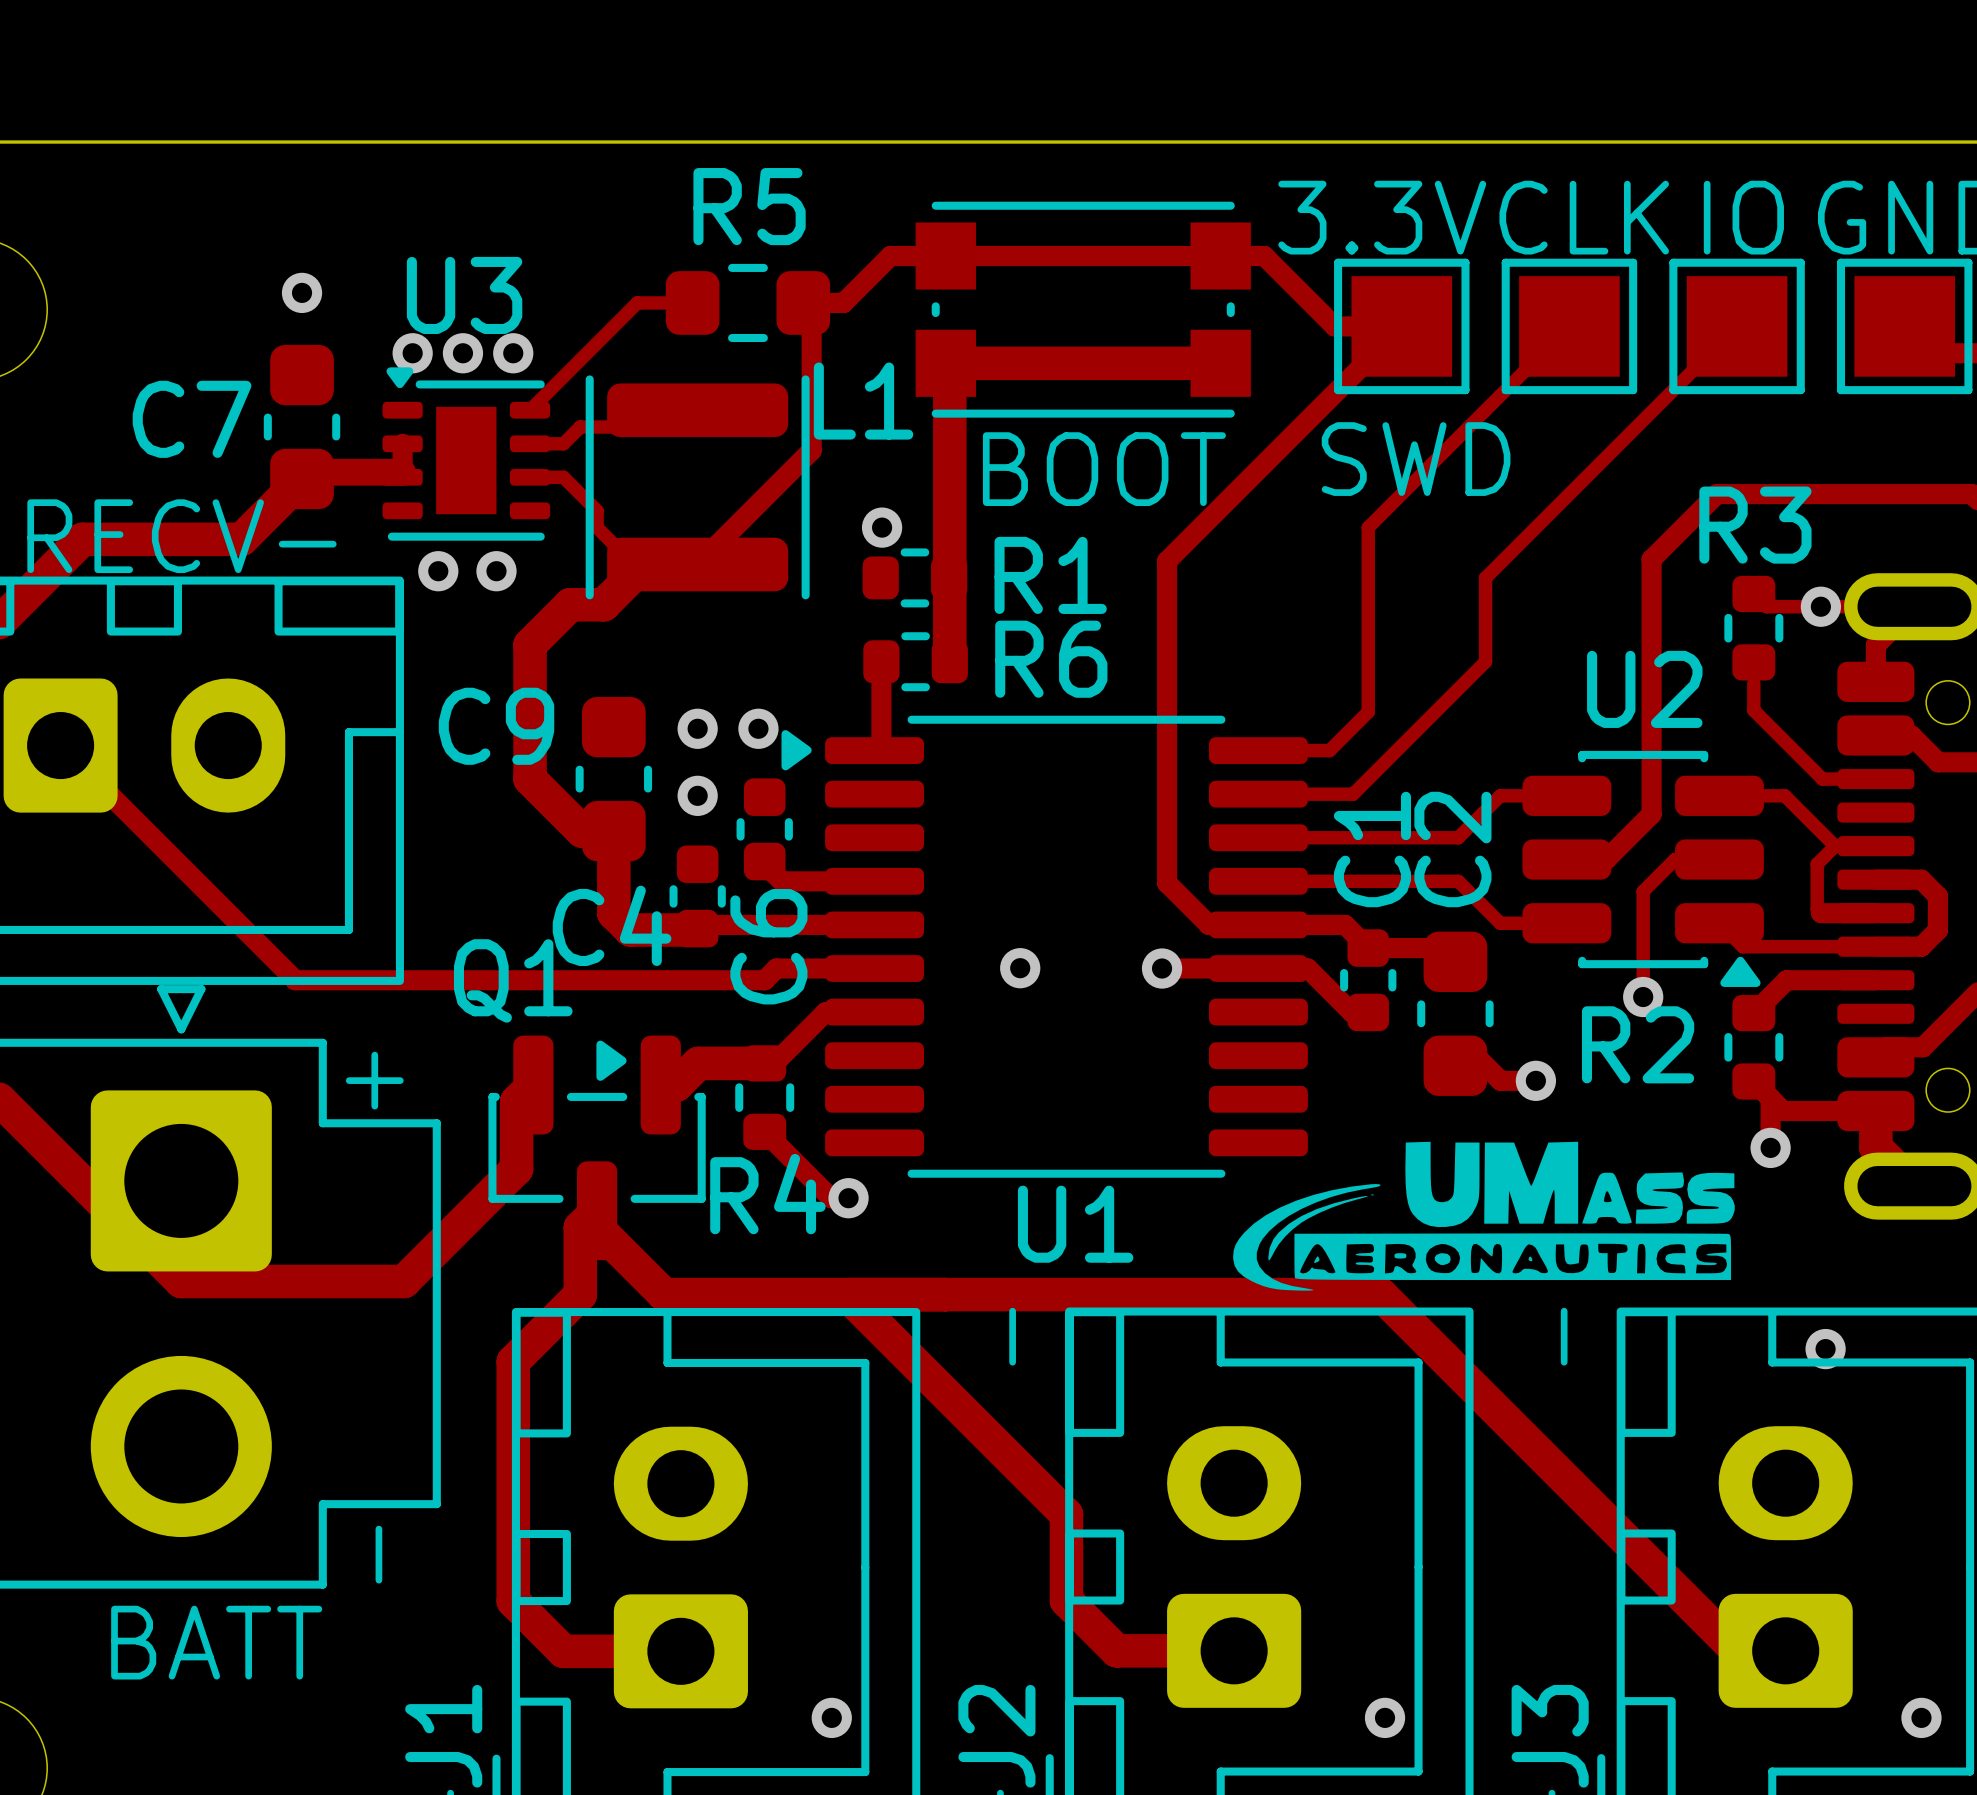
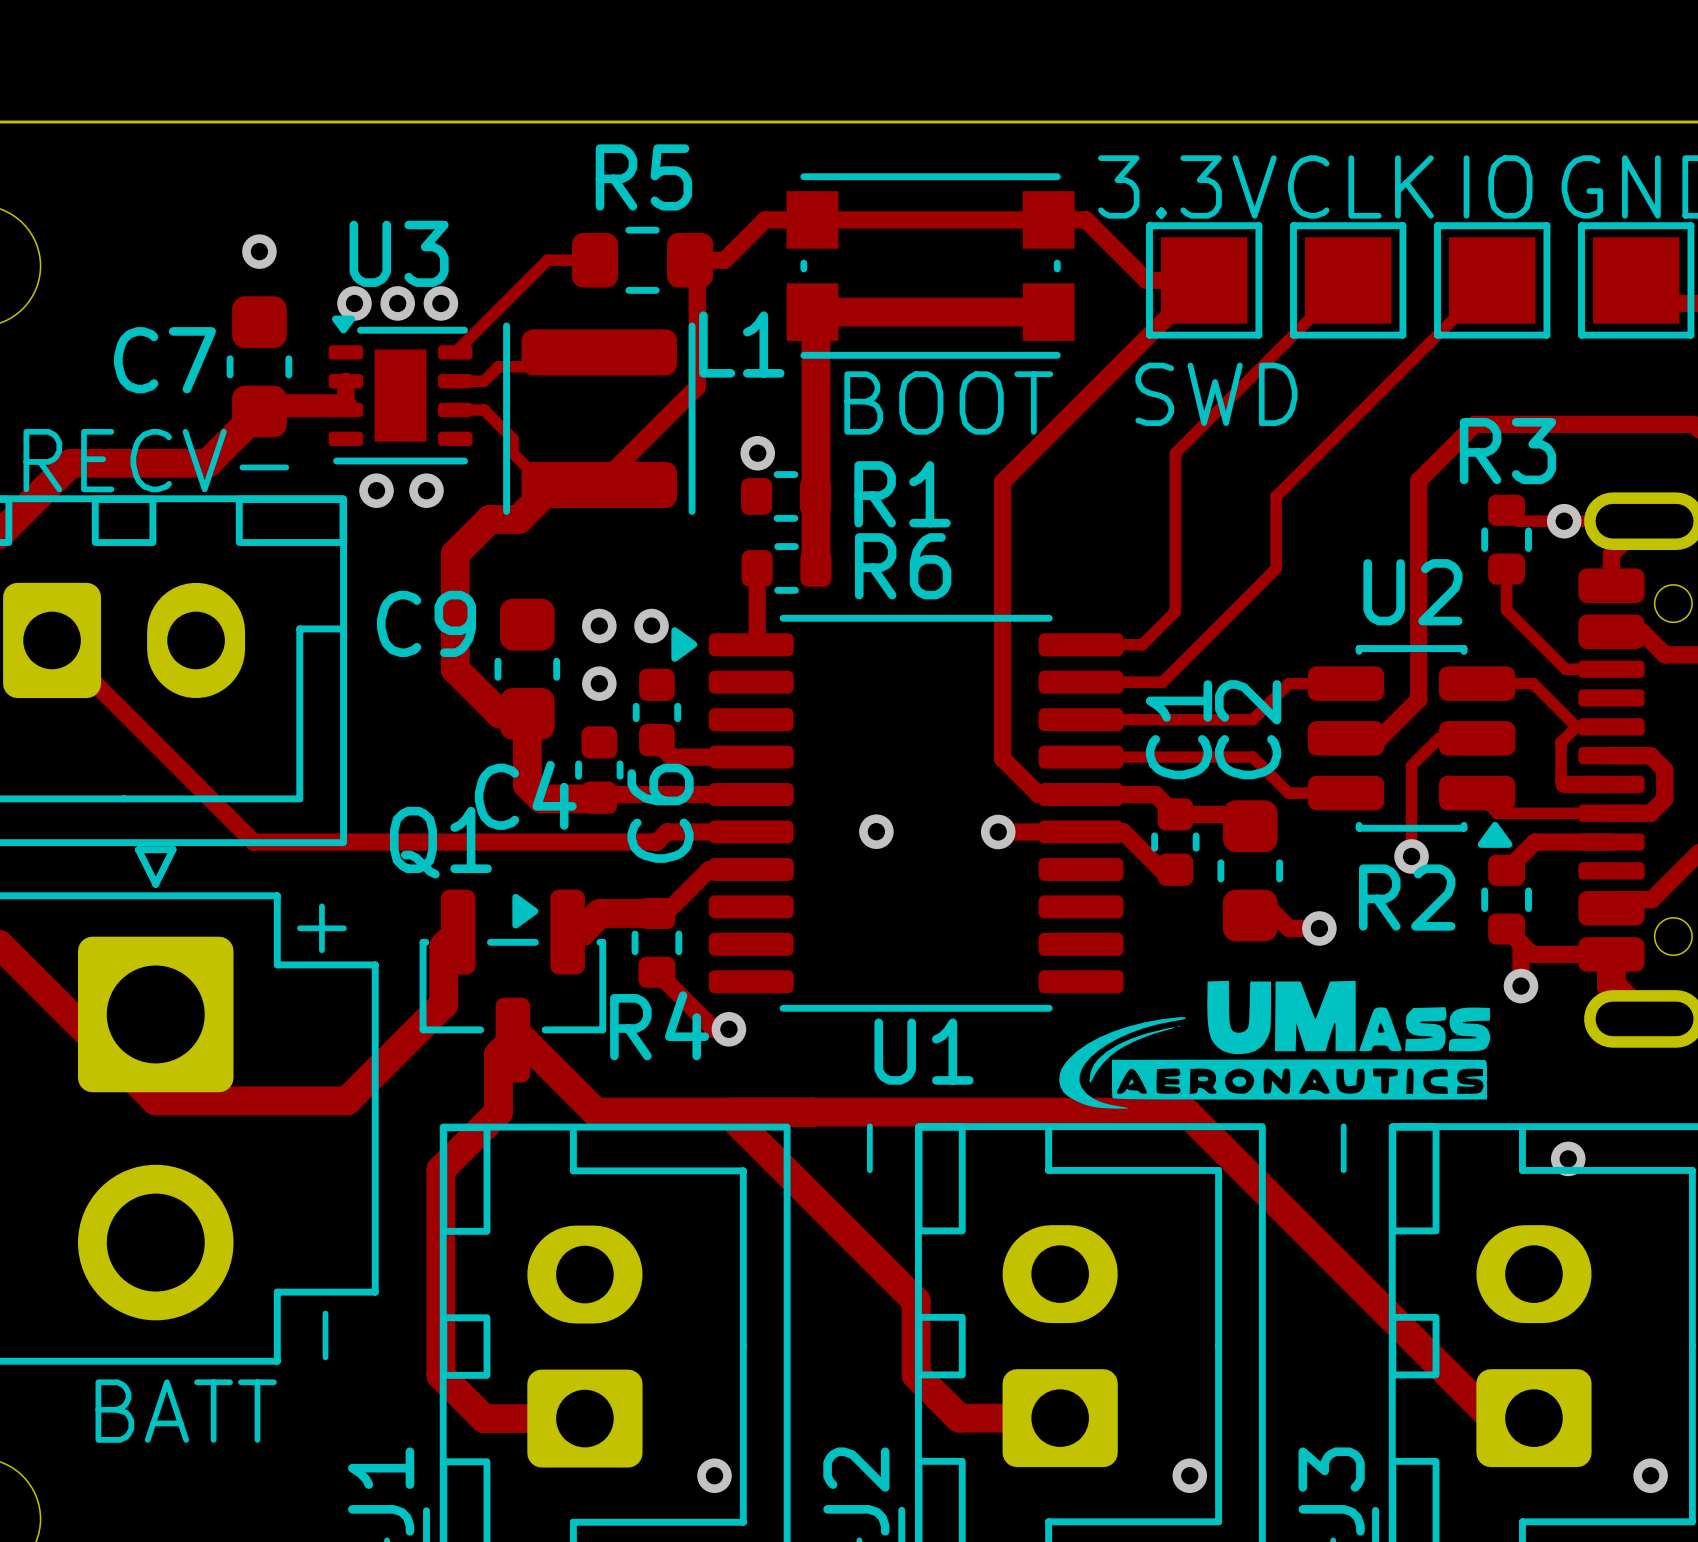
track: (597, 1227) (664, 1294) (693, 1294) -> (512, 1040) (523, 1040) (595, 1112)

